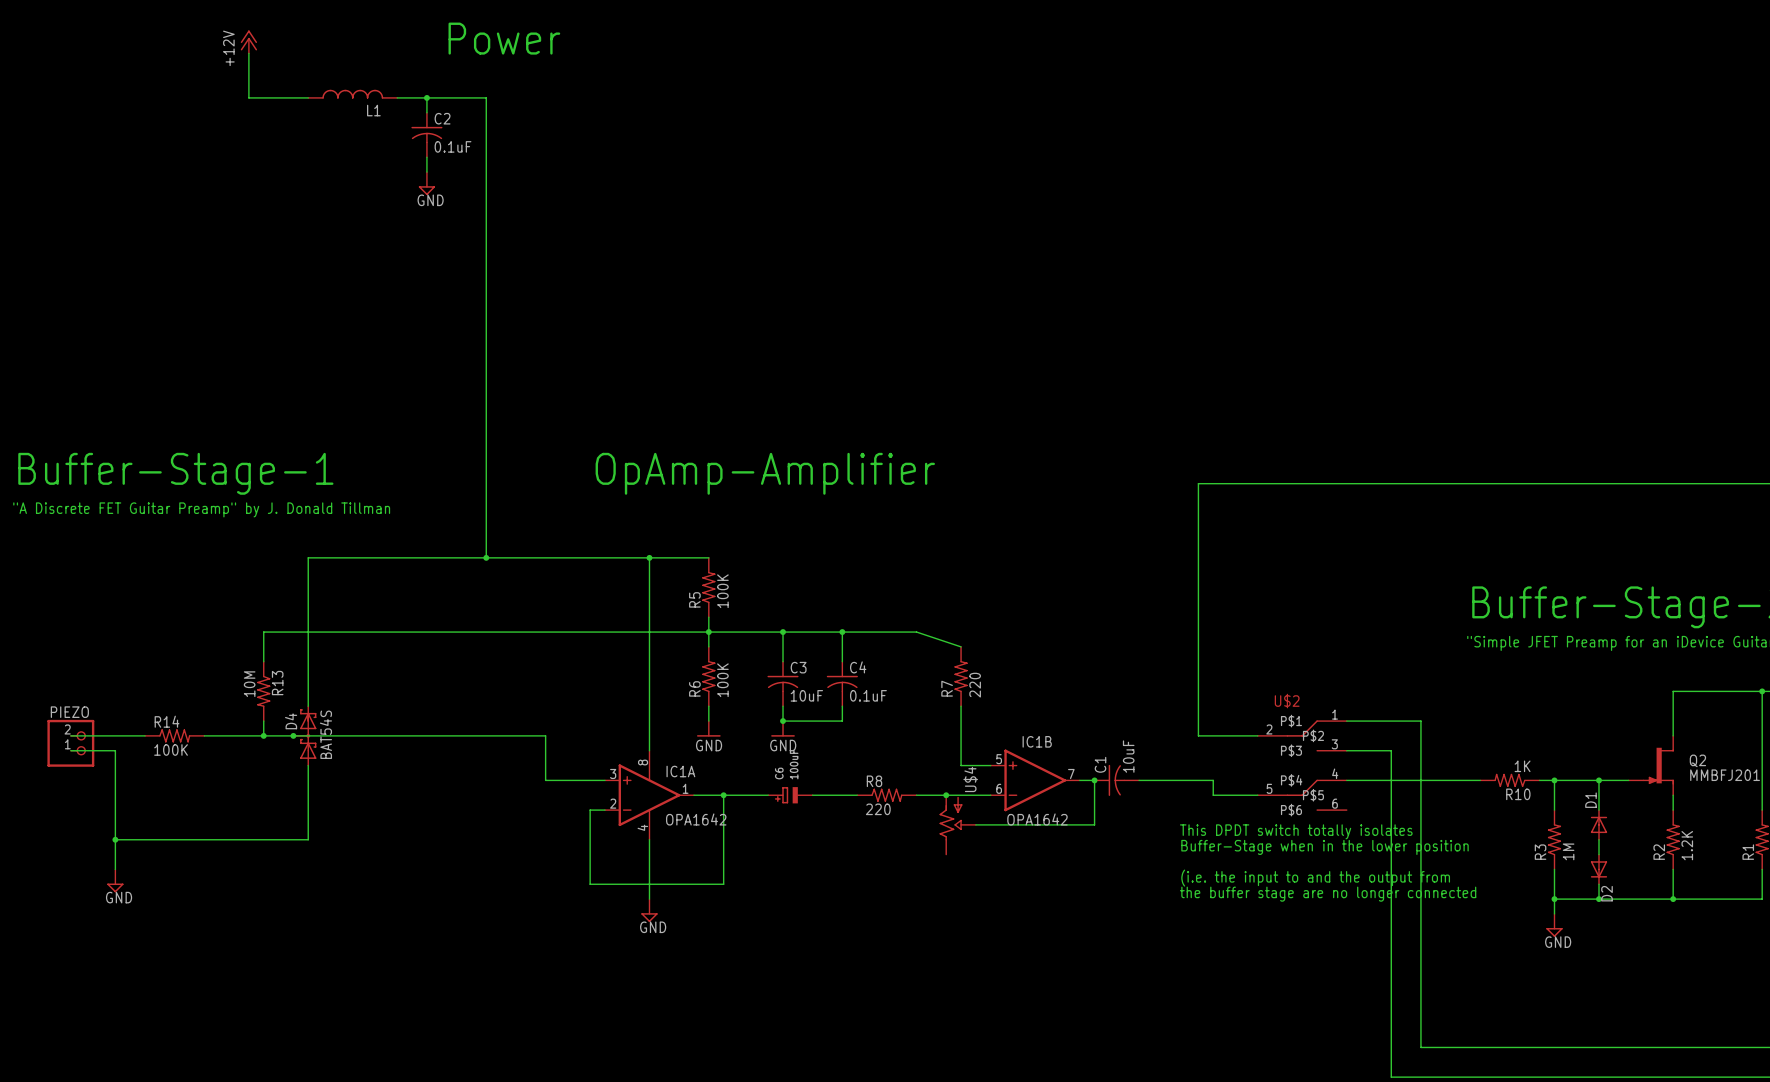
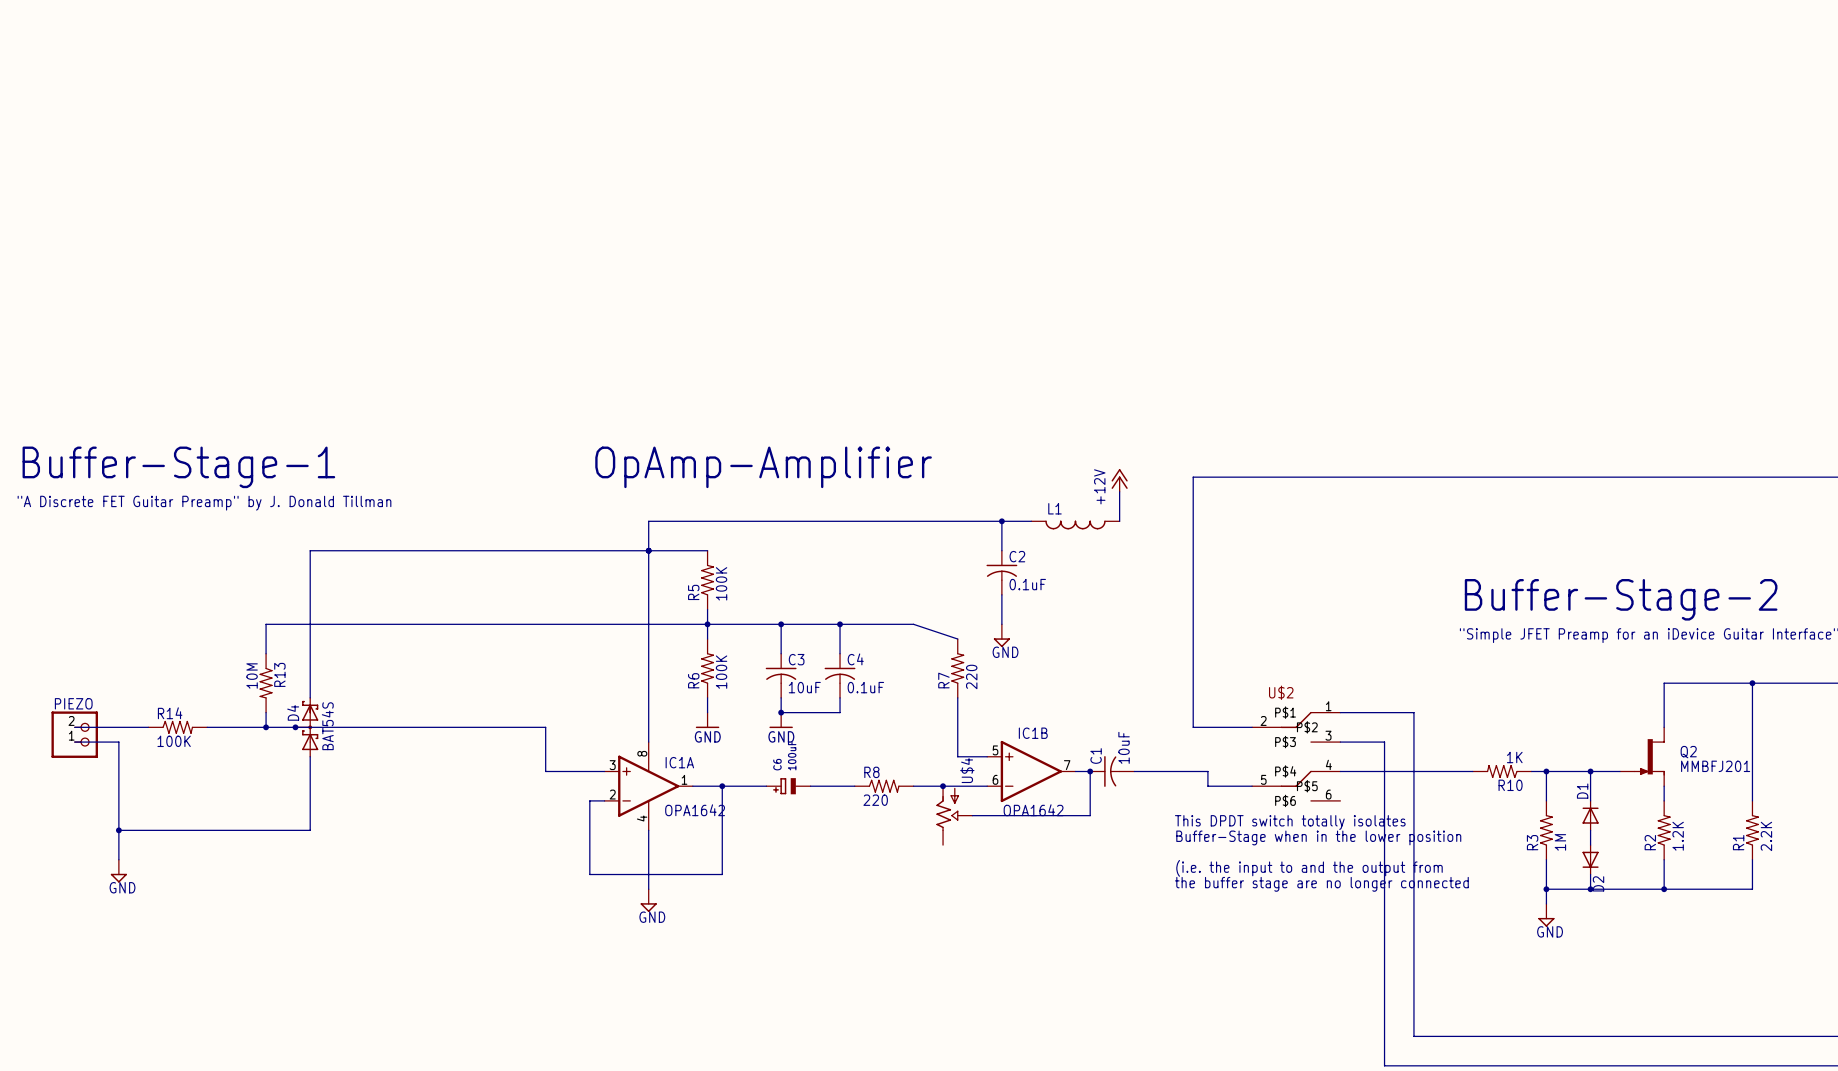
text: Power (504, 38) -> none
power symbol: +12V (248, 41) -> none
wire: (248, 53) (248, 97) (308, 97) -> none
L1 rotation: 0° (352, 94) -> 180° (1075, 524)
L1 position: (352, 94) -> (1075, 524)
wire: (397, 97) (486, 97) (486, 557) -> none
wire: (426, 97) (426, 112) -> none
junction: (426, 97) -> none
C2 position: (426, 135) -> (1001, 572)
wire: (426, 157) (426, 172) -> none
power symbol: GND (426, 183) -> none
power symbol: none -> +12V (1119, 480)
wire: none -> (1119, 491) (1119, 521)
wire: none -> (1001, 521) (1001, 550)
junction: none -> (1001, 521)
wire: none -> (1031, 521) (648, 521) (648, 550)
junction: (486, 557) -> none
wire: none -> (1001, 594) (1001, 624)
power symbol: none -> GND (1001, 635)

